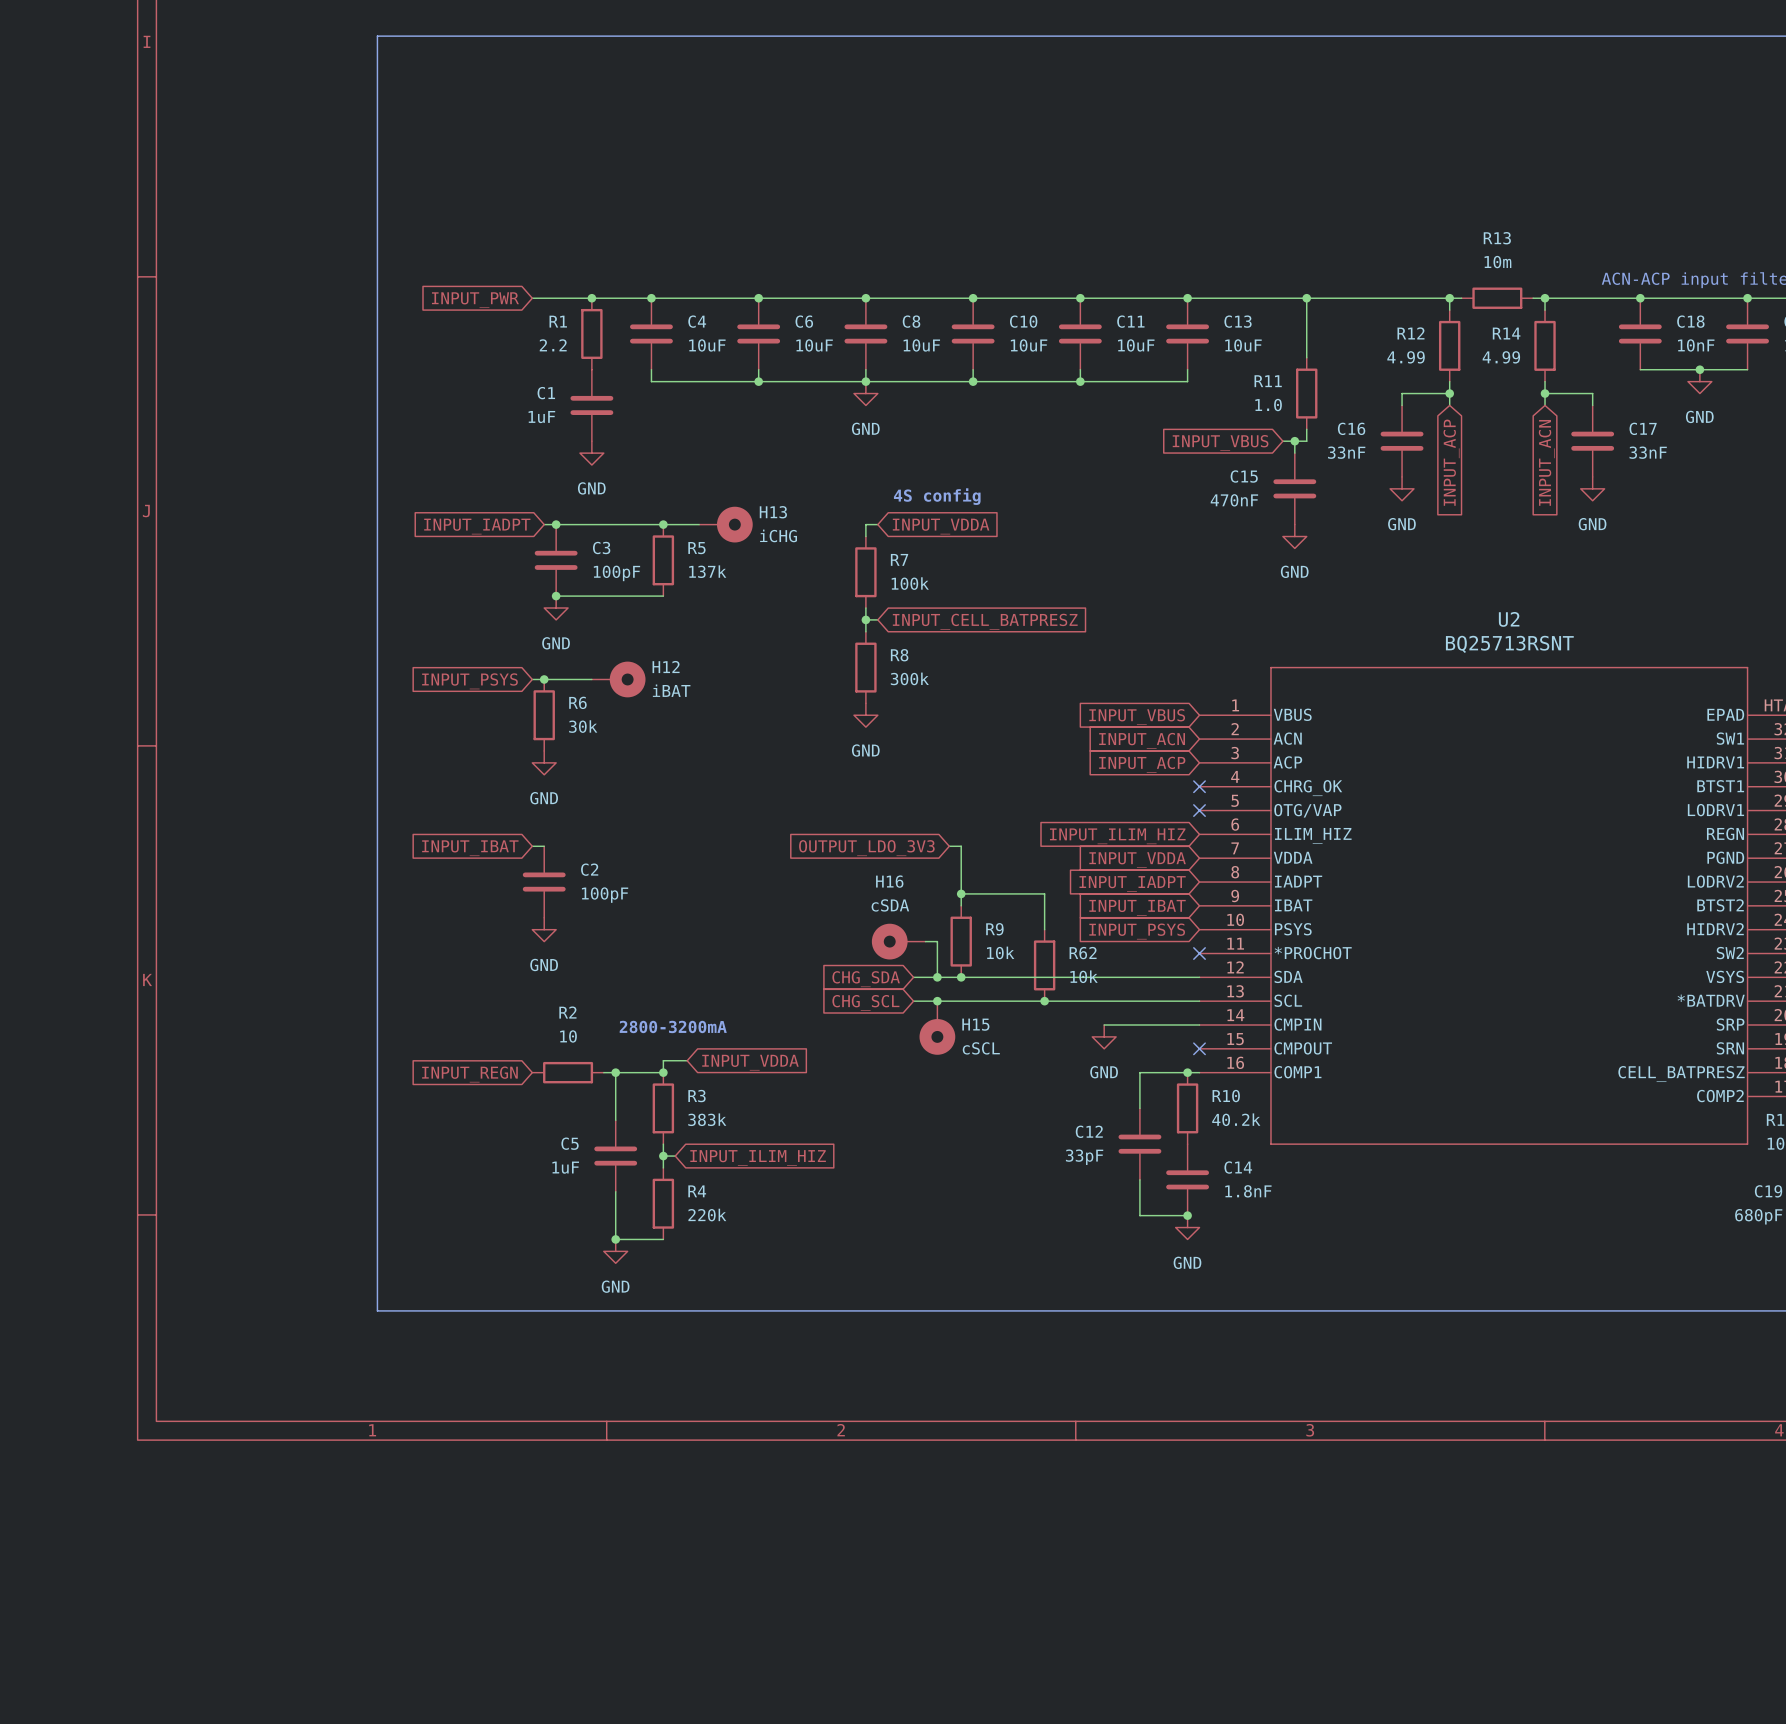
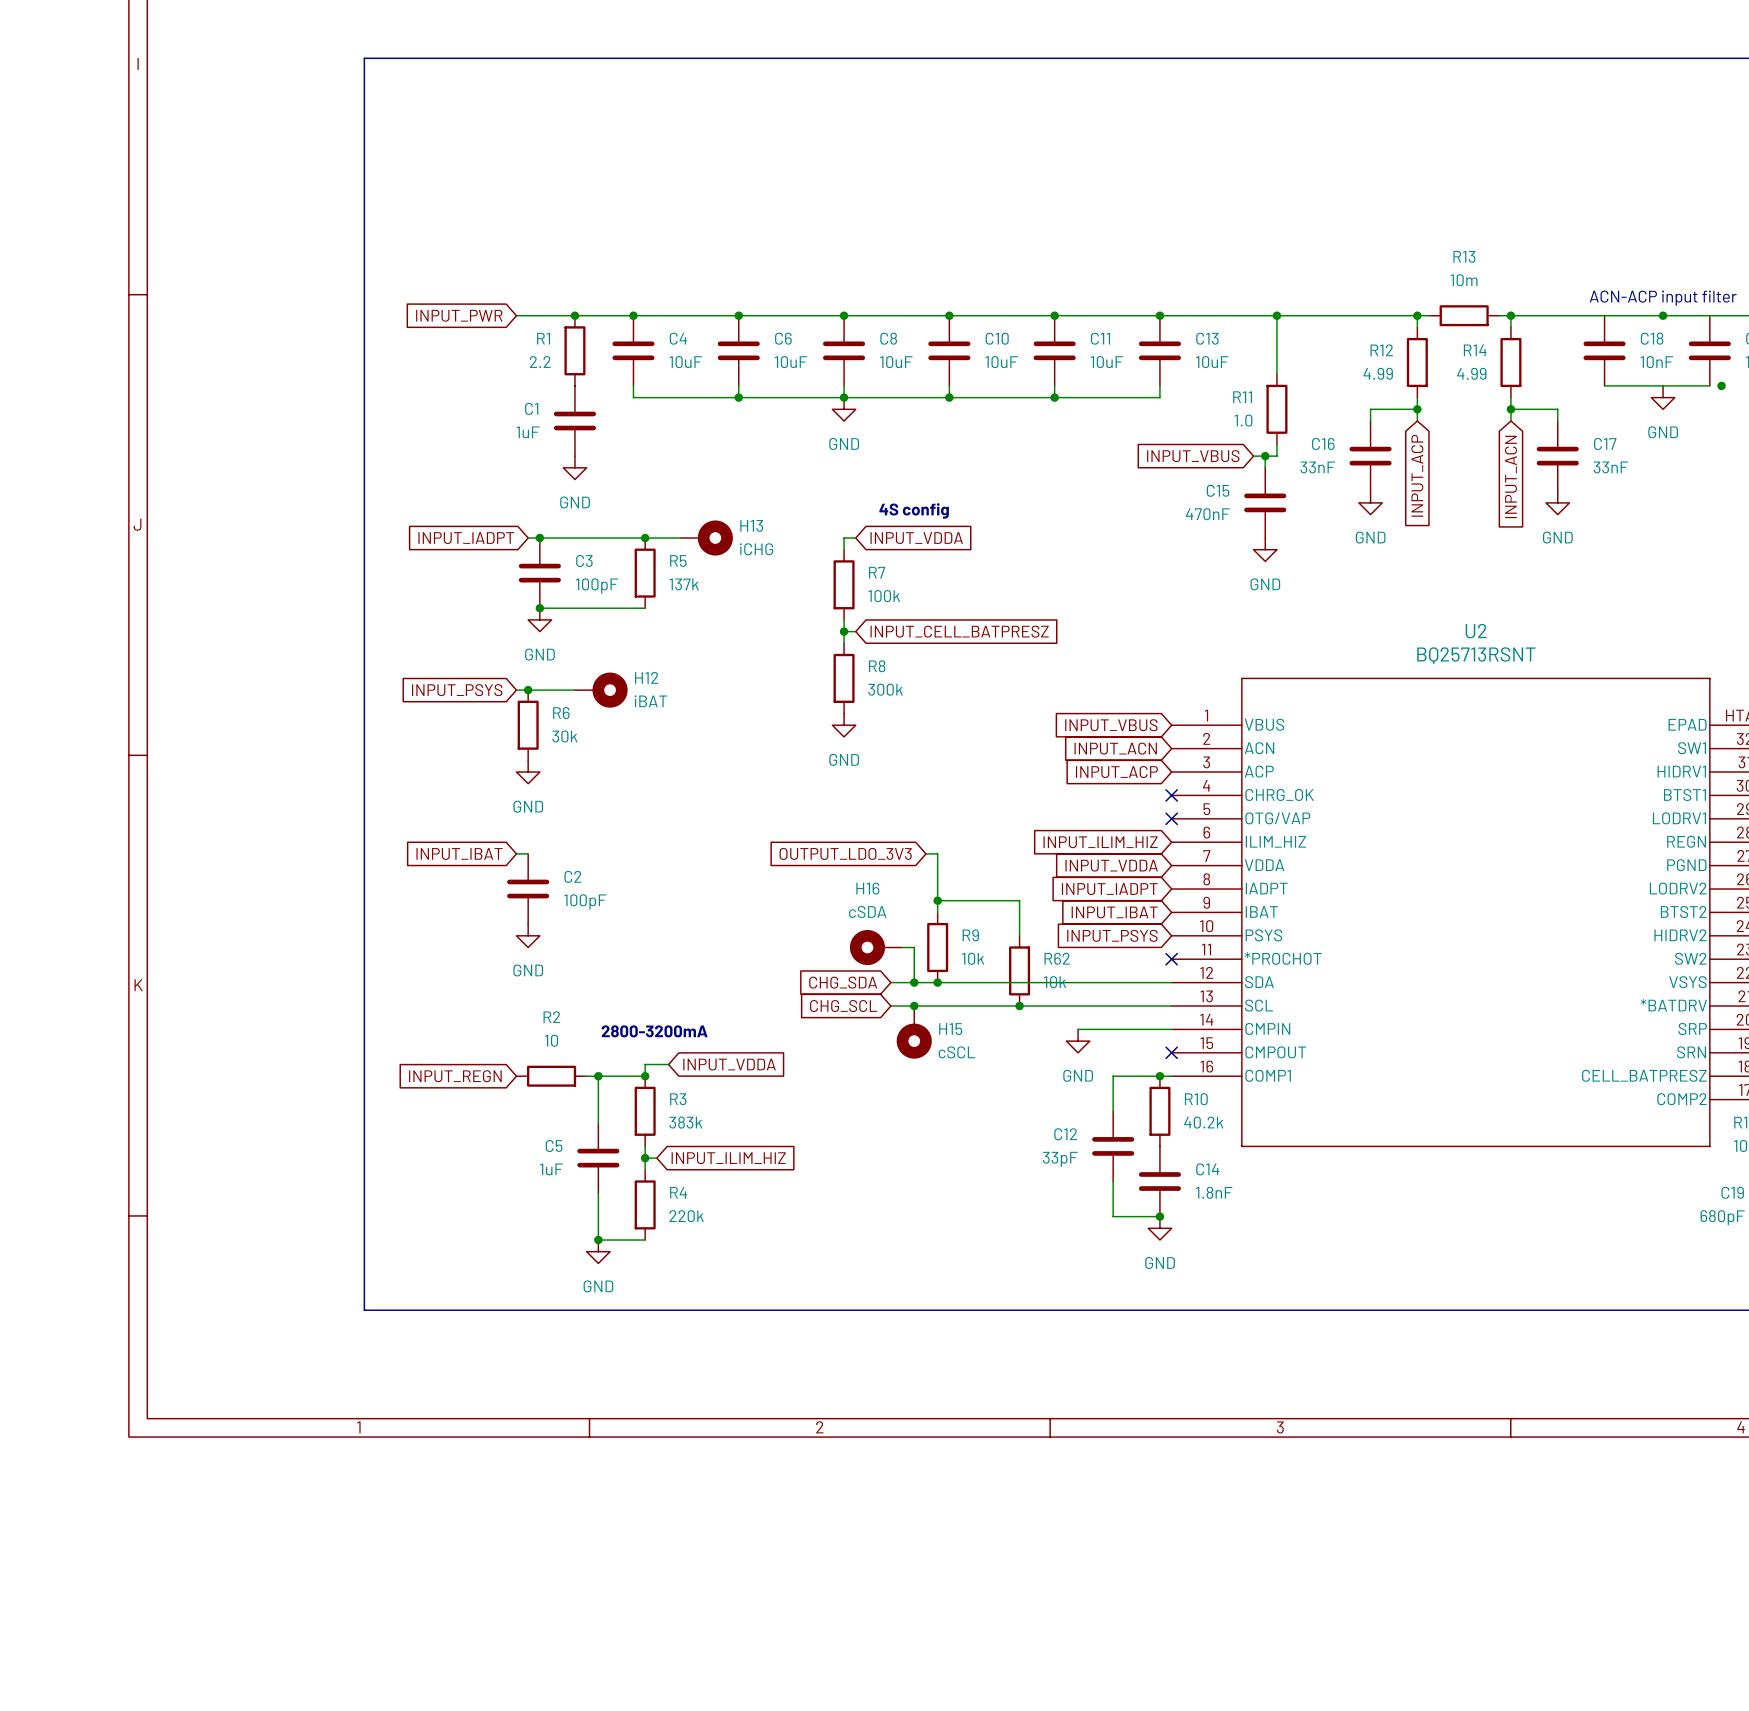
junction: (1640, 298) -> none
junction: none -> (1663, 315)
junction: (1747, 298) -> none
junction: (1699, 369) -> none
junction: none -> (1721, 385)

